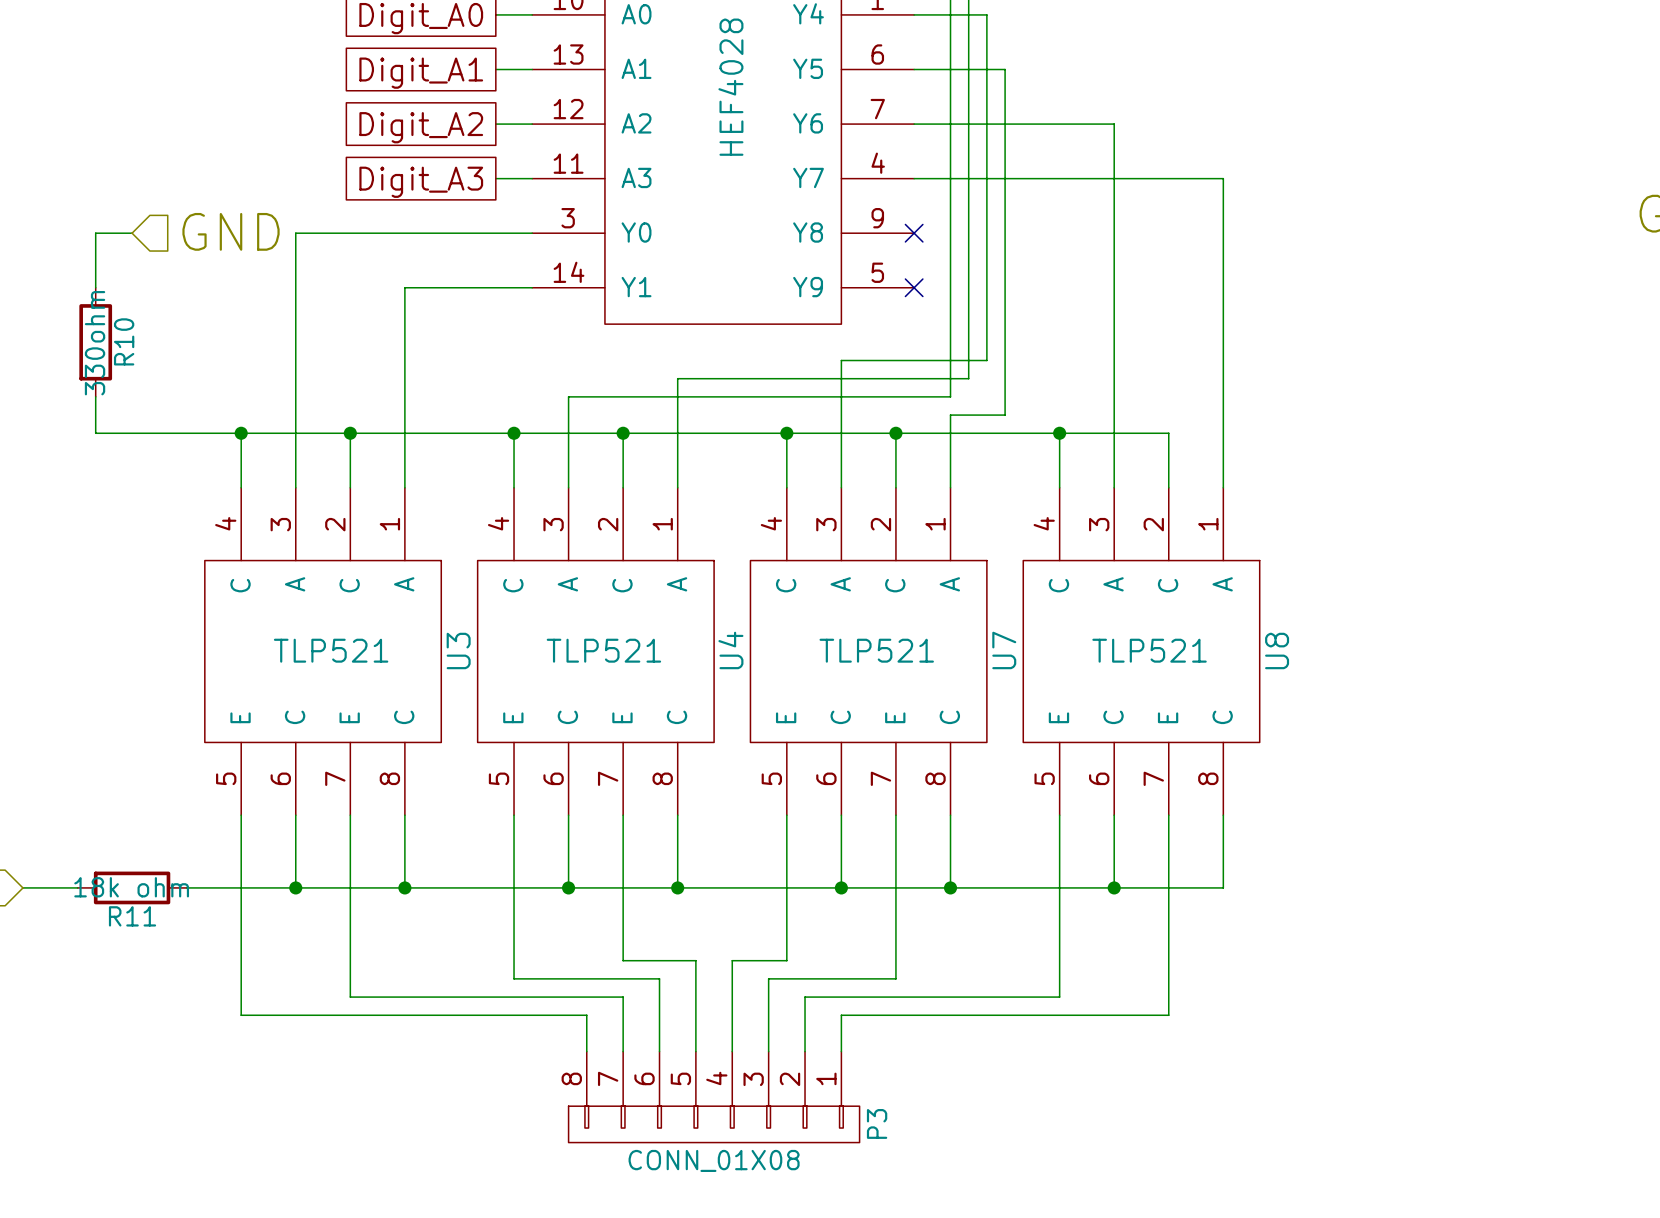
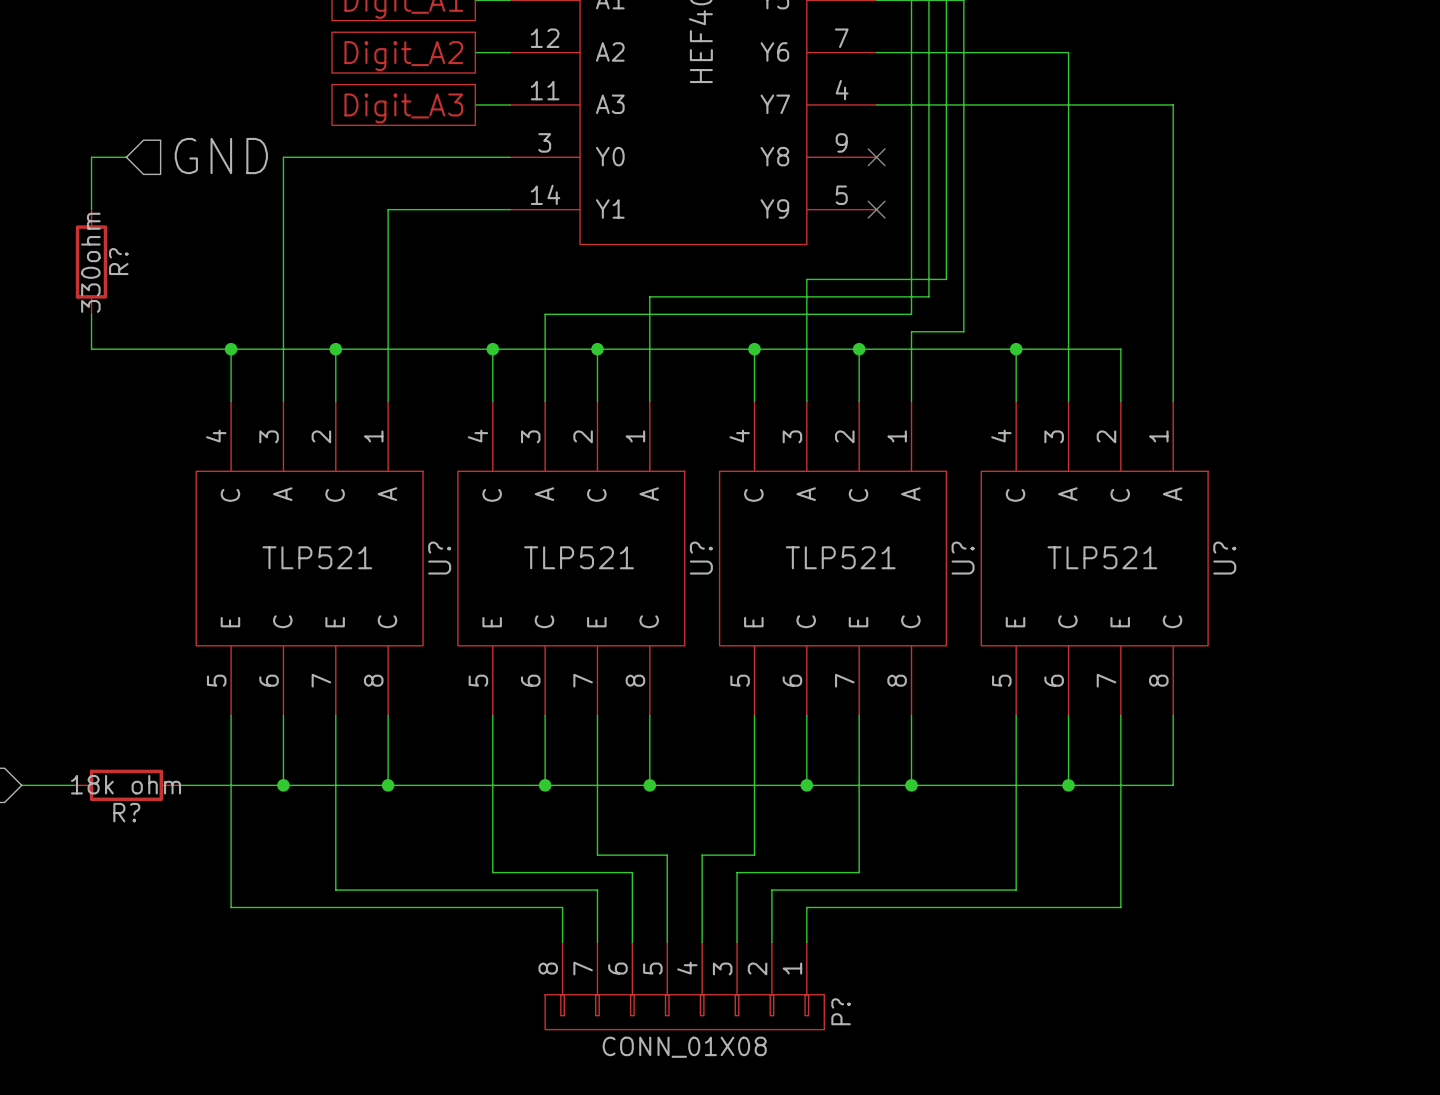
R10 name: R10 (124, 341) -> R? (118, 261)
U3 name: U3 (458, 650) -> U? (439, 558)
U4 name: U4 (730, 650) -> U? (701, 558)
U7 name: U7 (1004, 650) -> U? (963, 558)
U8 name: U8 (1277, 650) -> U? (1224, 558)
R11 name: R11 (132, 916) -> R? (126, 812)
P3 name: P3 (877, 1123) -> P? (841, 1011)

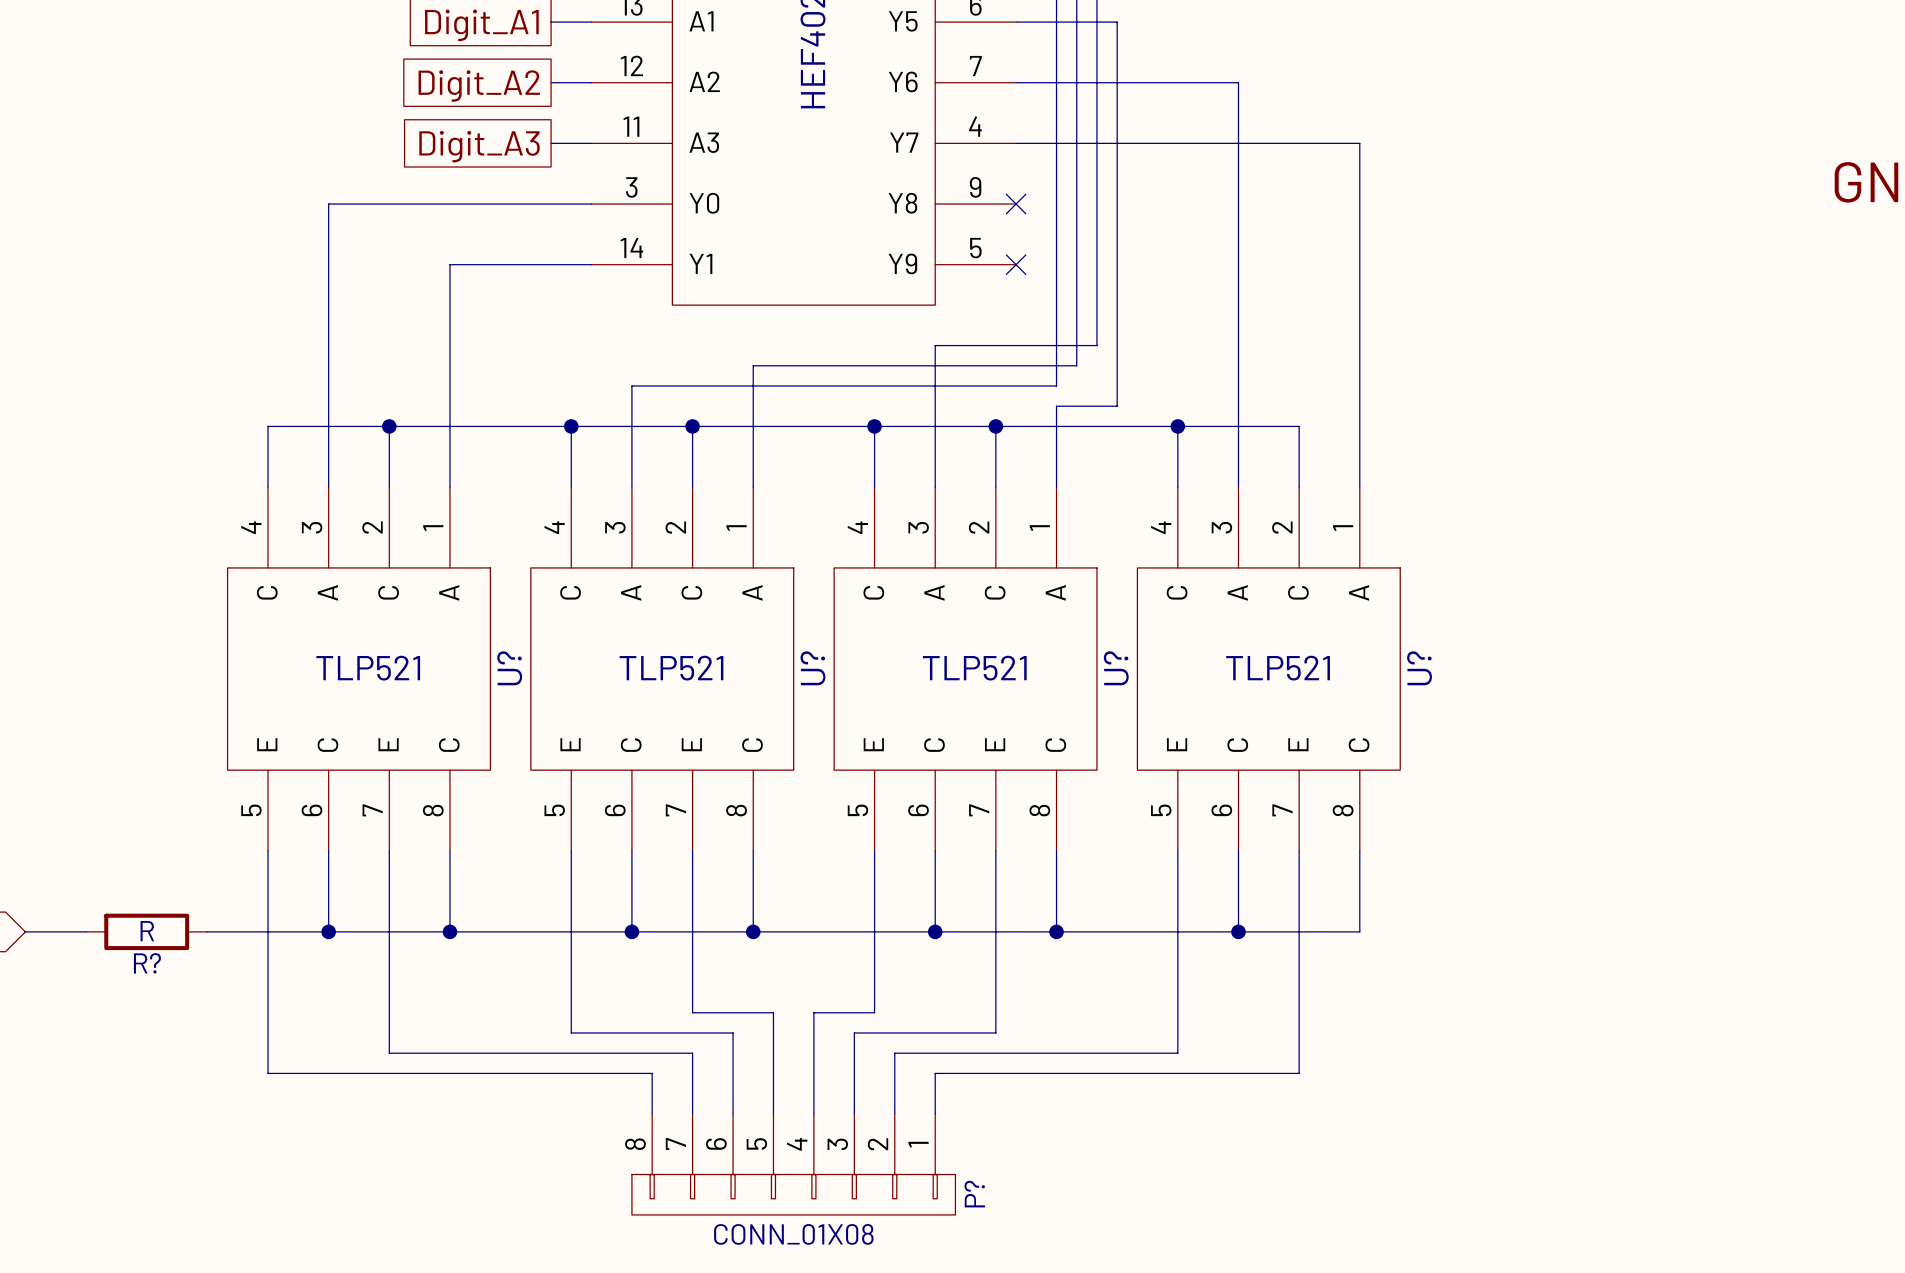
hierarchical label: GND (221, 156) -> none
wire: (126, 157) (91, 157) (91, 209) -> none
R?: 330ohm (91, 261) -> none
wire: (91, 314) (91, 349) (231, 349) -> none
junction: (231, 349) -> none
R? value: 18k ohm (126, 784) -> R (147, 931)

